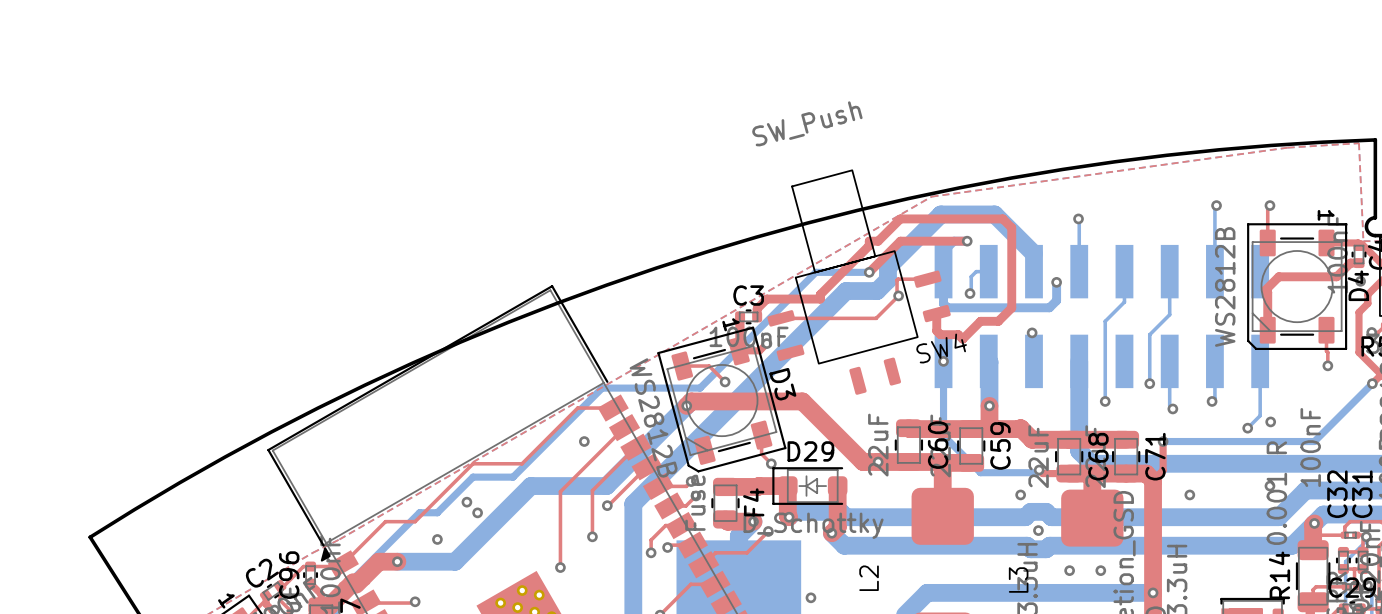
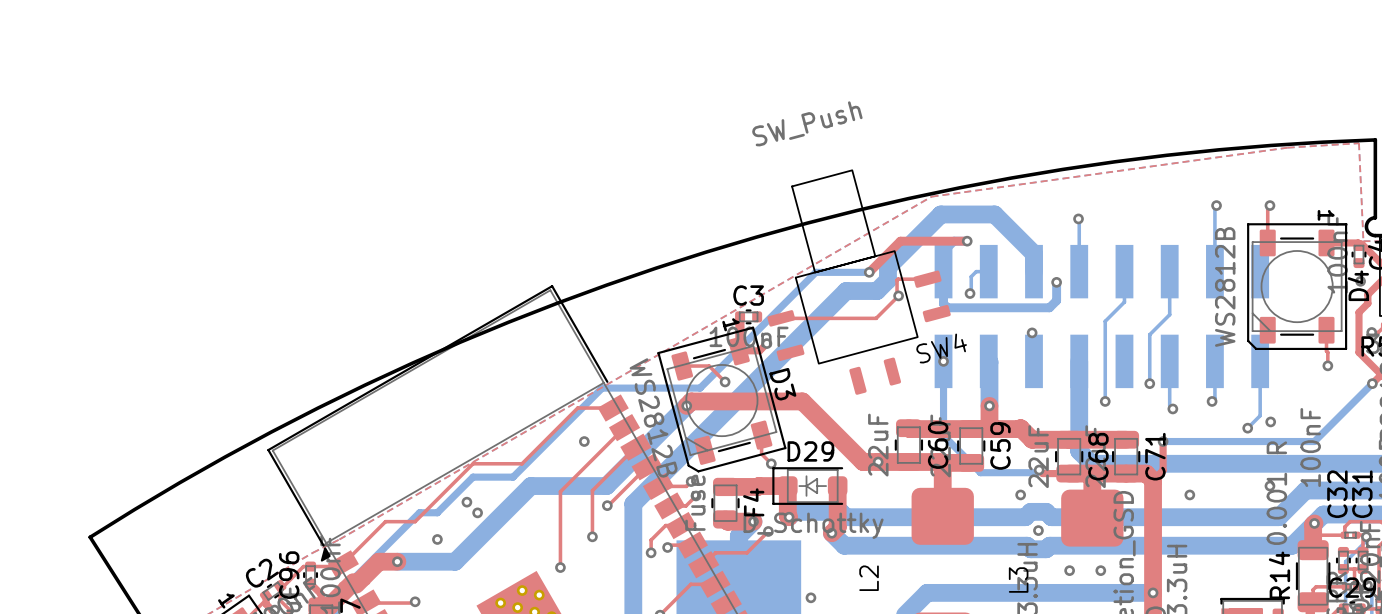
top track: (1359, 263) (1350, 263) (1336, 276) (1278, 276) (1265, 290) (1267, 292) (1267, 330) -> none
top track: (936, 313) (936, 330) (940, 334) (958, 334) (962, 339) (980, 321) (998, 321) (1011, 307) (1011, 227) (1002, 218) (900, 218) (878, 241) (869, 241) (869, 245) (820, 294) (820, 299) (766, 299) (757, 308) (757, 316) -> none

